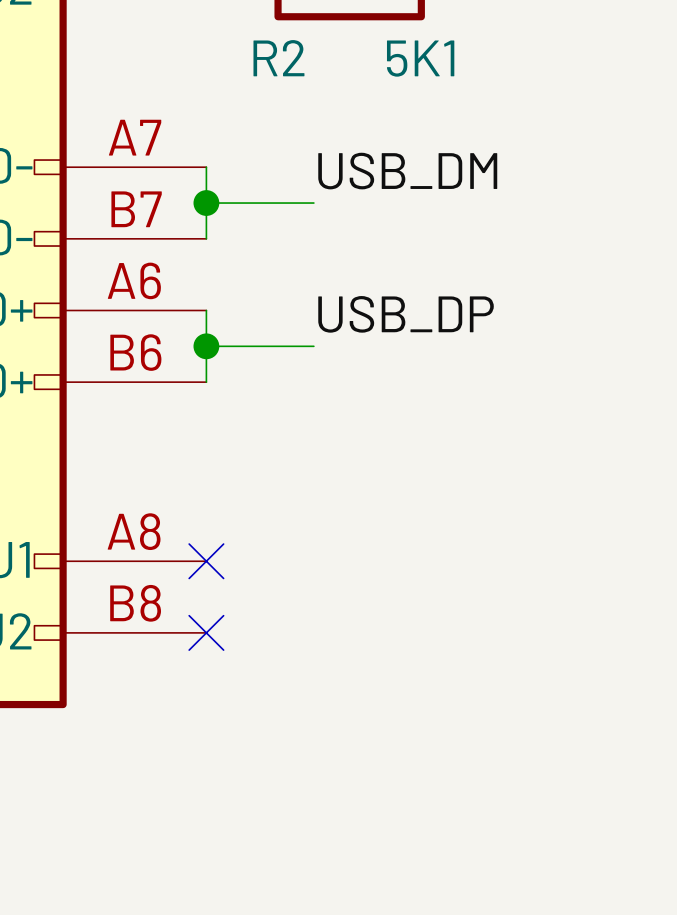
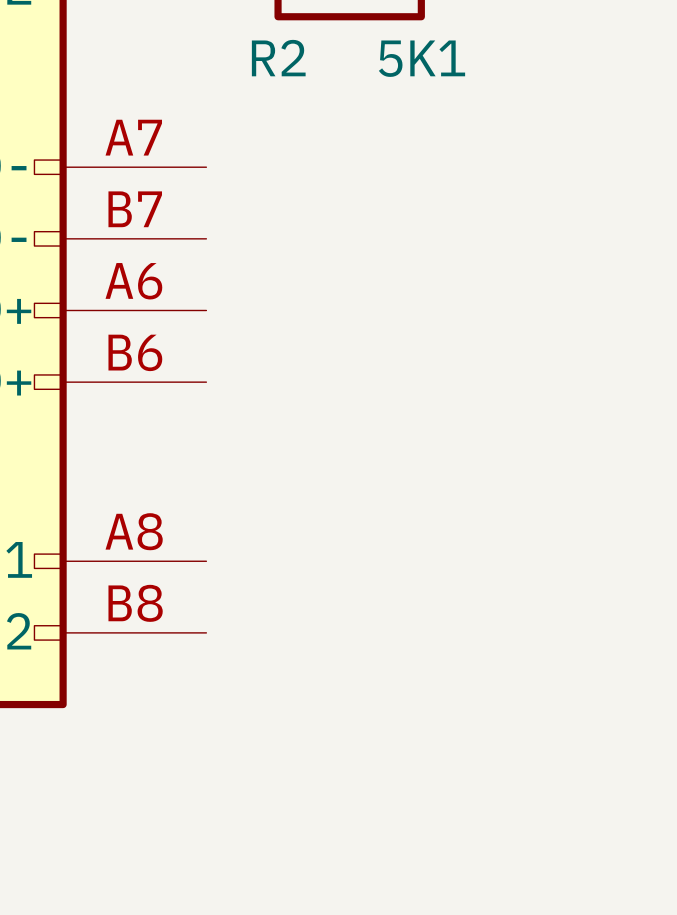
wire: (206, 167) (206, 238) -> none
label: USB_DM (407, 171) -> none
wire: (206, 203) (313, 203) -> none
junction: (206, 203) -> none
wire: (206, 310) (206, 382) -> none
label: USB_DP (406, 314) -> none
wire: (206, 346) (313, 346) -> none
junction: (206, 346) -> none
no-connect mark: (206, 561) -> none
no-connect mark: (206, 632) -> none

